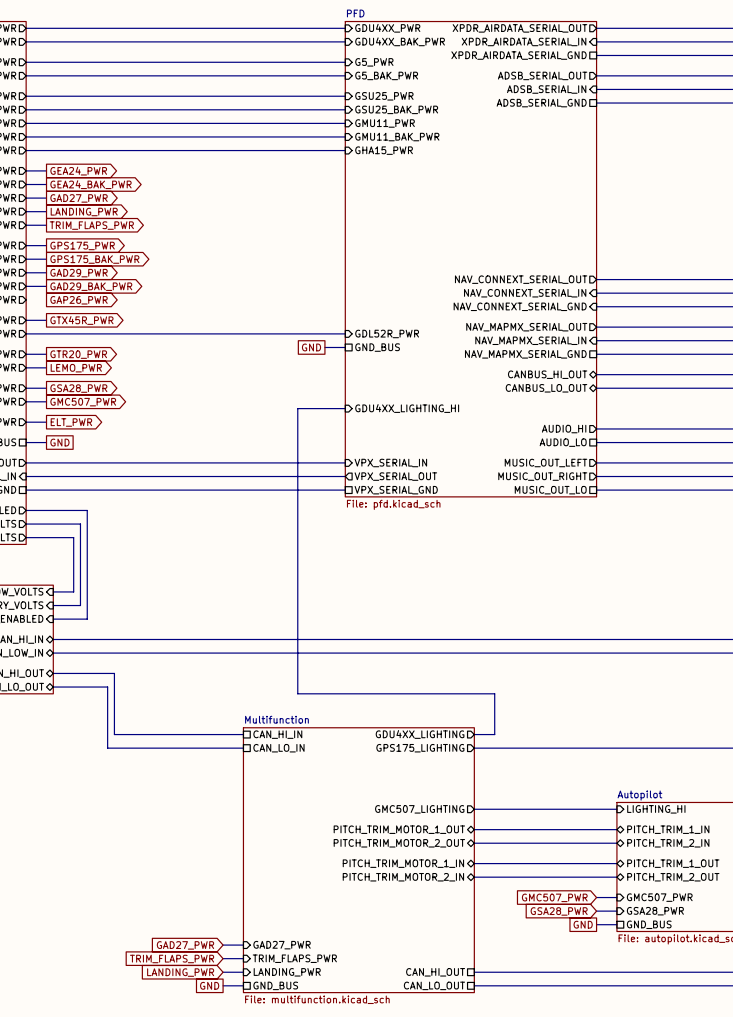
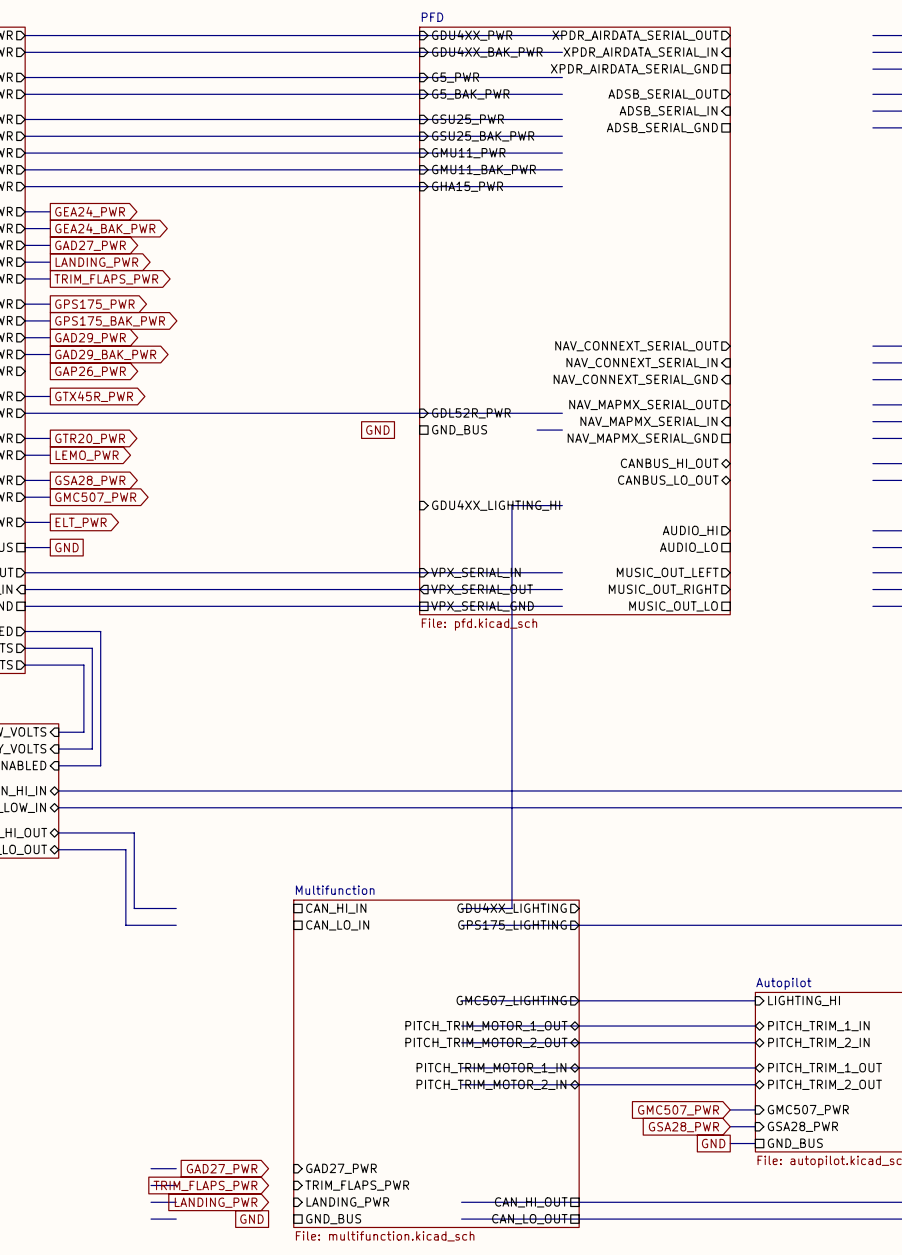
wire: none -> (419, 35) (562, 35)
wire: (596, 28) (712, 28) -> none
wire: none -> (419, 52) (562, 52)
wire: (596, 41) (712, 41) -> none
wire: (596, 55) (712, 55) -> none
wire: none -> (419, 77) (562, 77)
wire: none -> (419, 94) (562, 94)
wire: (596, 75) (712, 75) -> none
wire: (596, 89) (712, 89) -> none
wire: none -> (419, 119) (562, 119)
wire: (596, 103) (712, 103) -> none
wire: none -> (419, 136) (562, 136)
wire: none -> (419, 153) (562, 153)
wire: none -> (419, 169) (562, 169)
wire: none -> (419, 186) (562, 186)
wire: (596, 279) (712, 279) -> none
wire: (596, 293) (712, 293) -> none
wire: (596, 306) (712, 306) -> none
wire: (596, 327) (712, 327) -> none
wire: none -> (419, 413) (562, 413)
wire: (596, 340) (712, 340) -> none
wire: (324, 347) (345, 347) -> (537, 430) (562, 430)
wire: (596, 354) (712, 354) -> none
wire: (596, 374) (712, 374) -> none
wire: (596, 388) (712, 388) -> none
wire: (345, 408) (297, 408) (297, 693) (494, 693) (494, 734) (474, 734) -> none
wire: none -> (562, 505) (511, 505) (511, 908) (461, 908)
wire: (596, 428) (712, 428) -> none
wire: (596, 442) (712, 442) -> none
wire: none -> (419, 572) (562, 572)
wire: (596, 462) (712, 462) -> none
wire: none -> (419, 589) (562, 589)
wire: (596, 476) (712, 476) -> none
wire: none -> (419, 606) (562, 606)
wire: (596, 490) (712, 490) -> none
wire: (148, 734) (243, 734) -> none
wire: (148, 748) (243, 748) -> none
wire: none -> (461, 925) (579, 925)
wire: none -> (461, 1000) (579, 1000)
wire: none -> (461, 1026) (579, 1026)
wire: none -> (461, 1042) (579, 1042)
wire: none -> (461, 1067) (579, 1067)
wire: none -> (461, 1084) (579, 1084)
wire: (223, 945) (243, 945) -> (151, 1168) (176, 1168)
wire: (223, 958) (243, 958) -> (151, 1185) (176, 1185)
wire: (223, 972) (243, 972) -> (151, 1202) (176, 1202)
wire: none -> (461, 1202) (579, 1202)
wire: (223, 985) (243, 985) -> (151, 1219) (176, 1219)
wire: none -> (461, 1219) (579, 1219)

